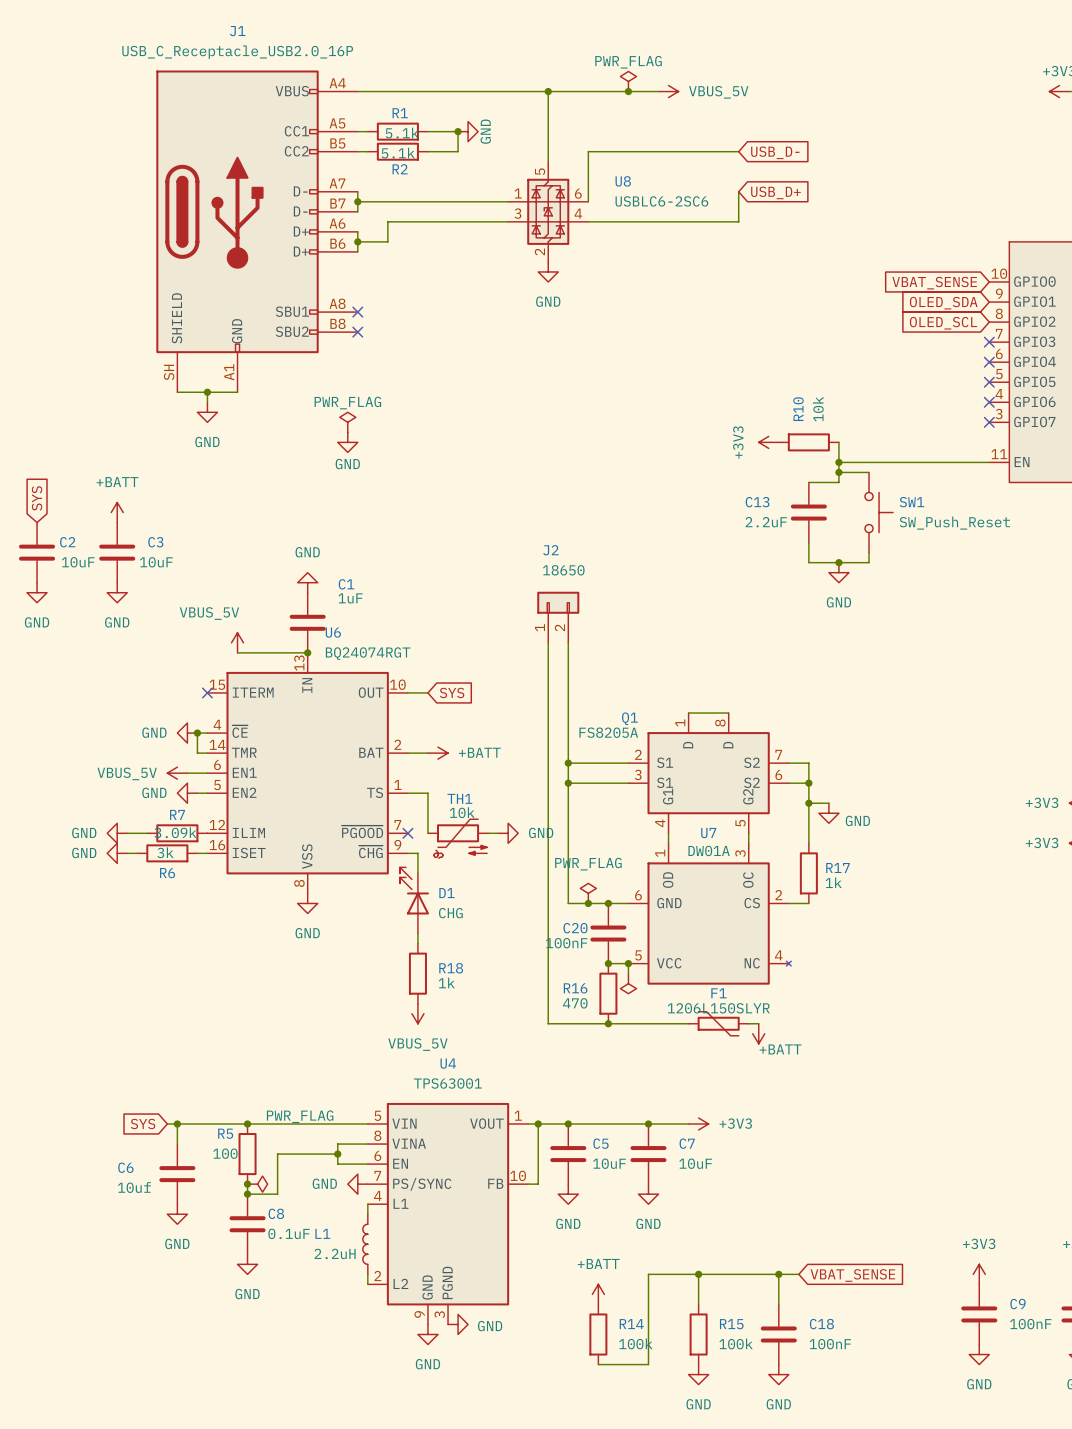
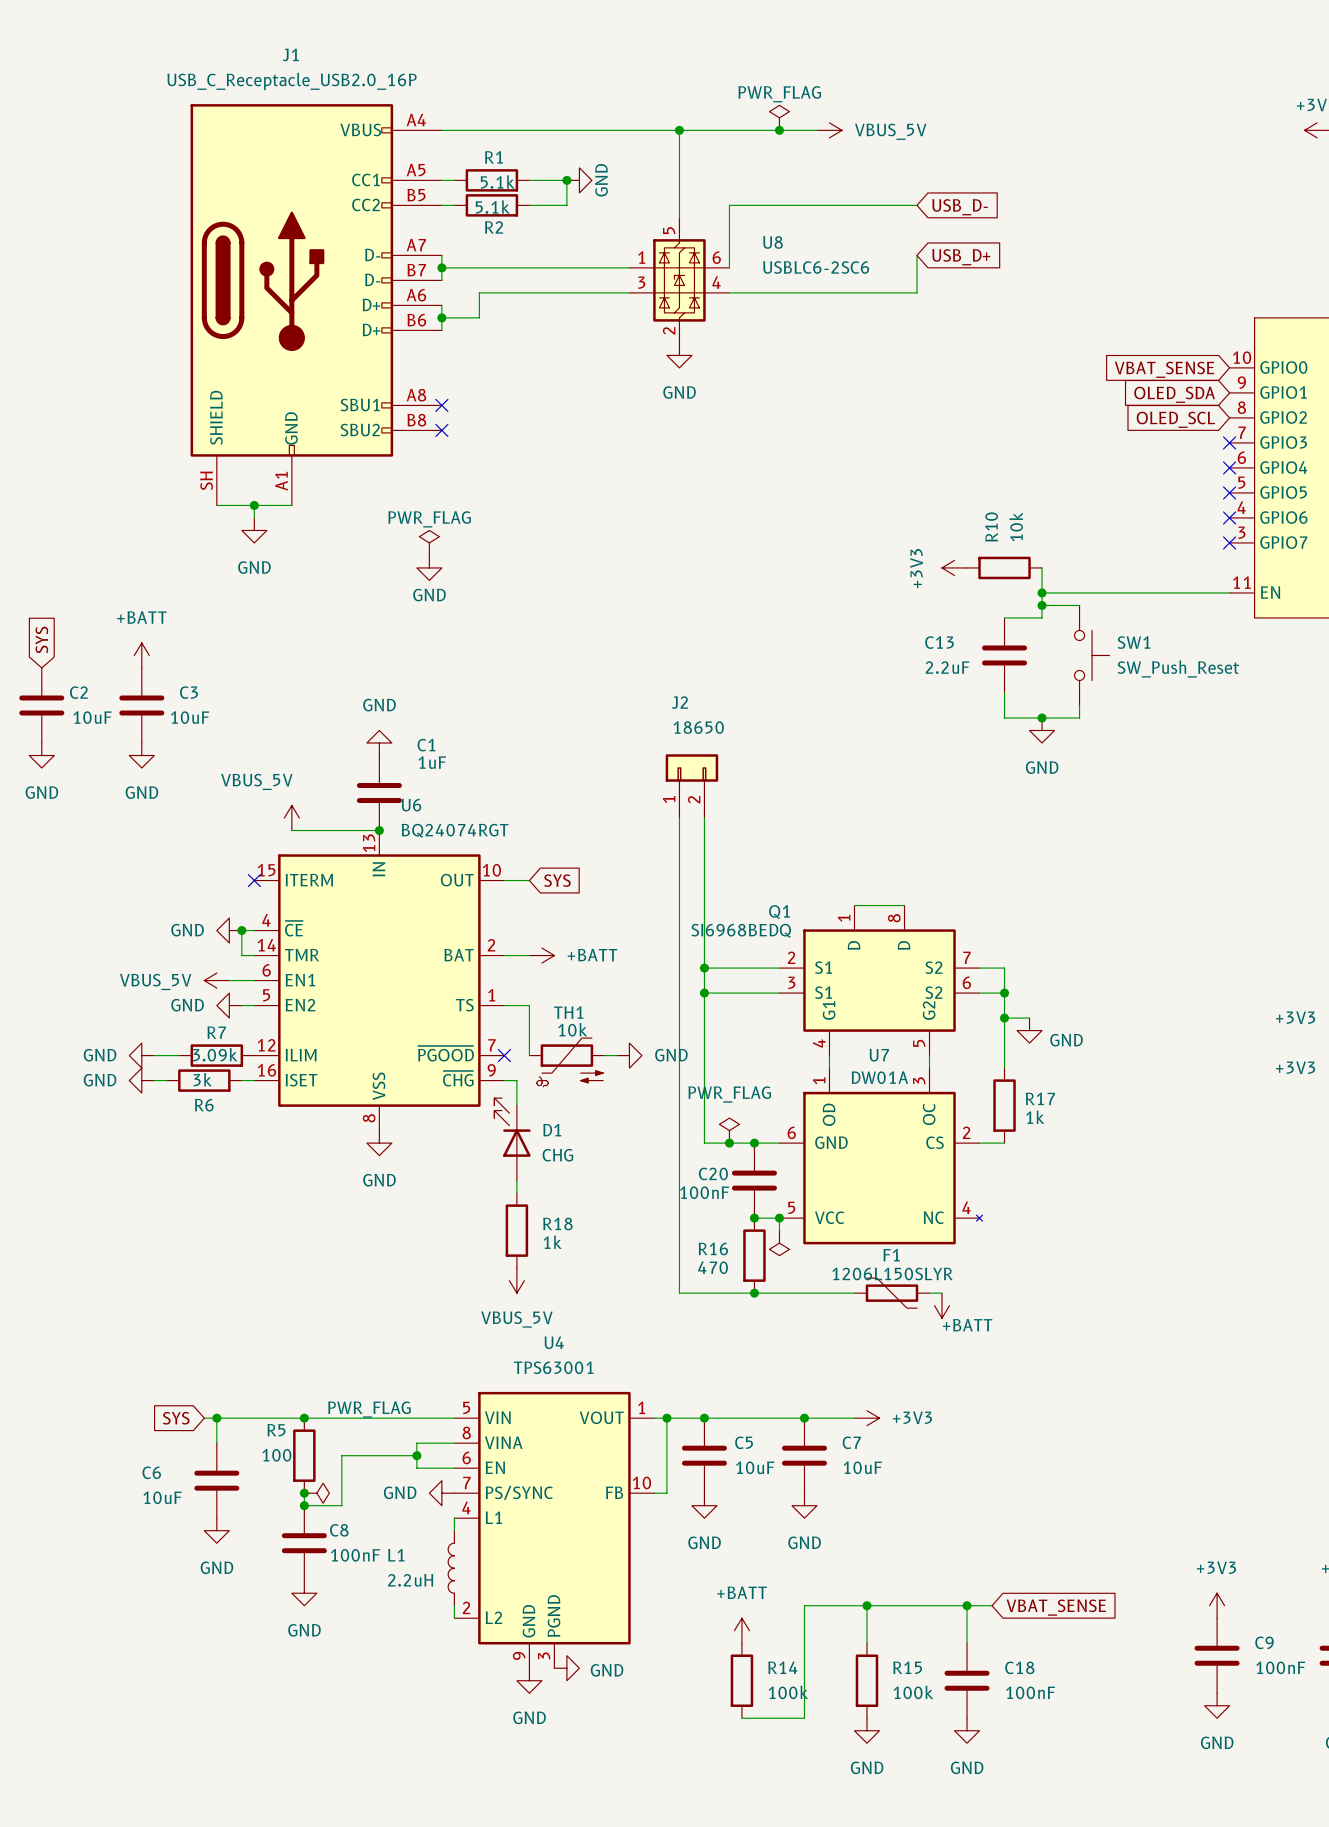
Q1 value: FS8205A (608, 732) -> SI6968BEDQ (741, 930)
C6 value: 10uf (134, 1187) -> 10uF (162, 1497)
C8 value: 0.1uF (289, 1233) -> 100nF (355, 1555)

